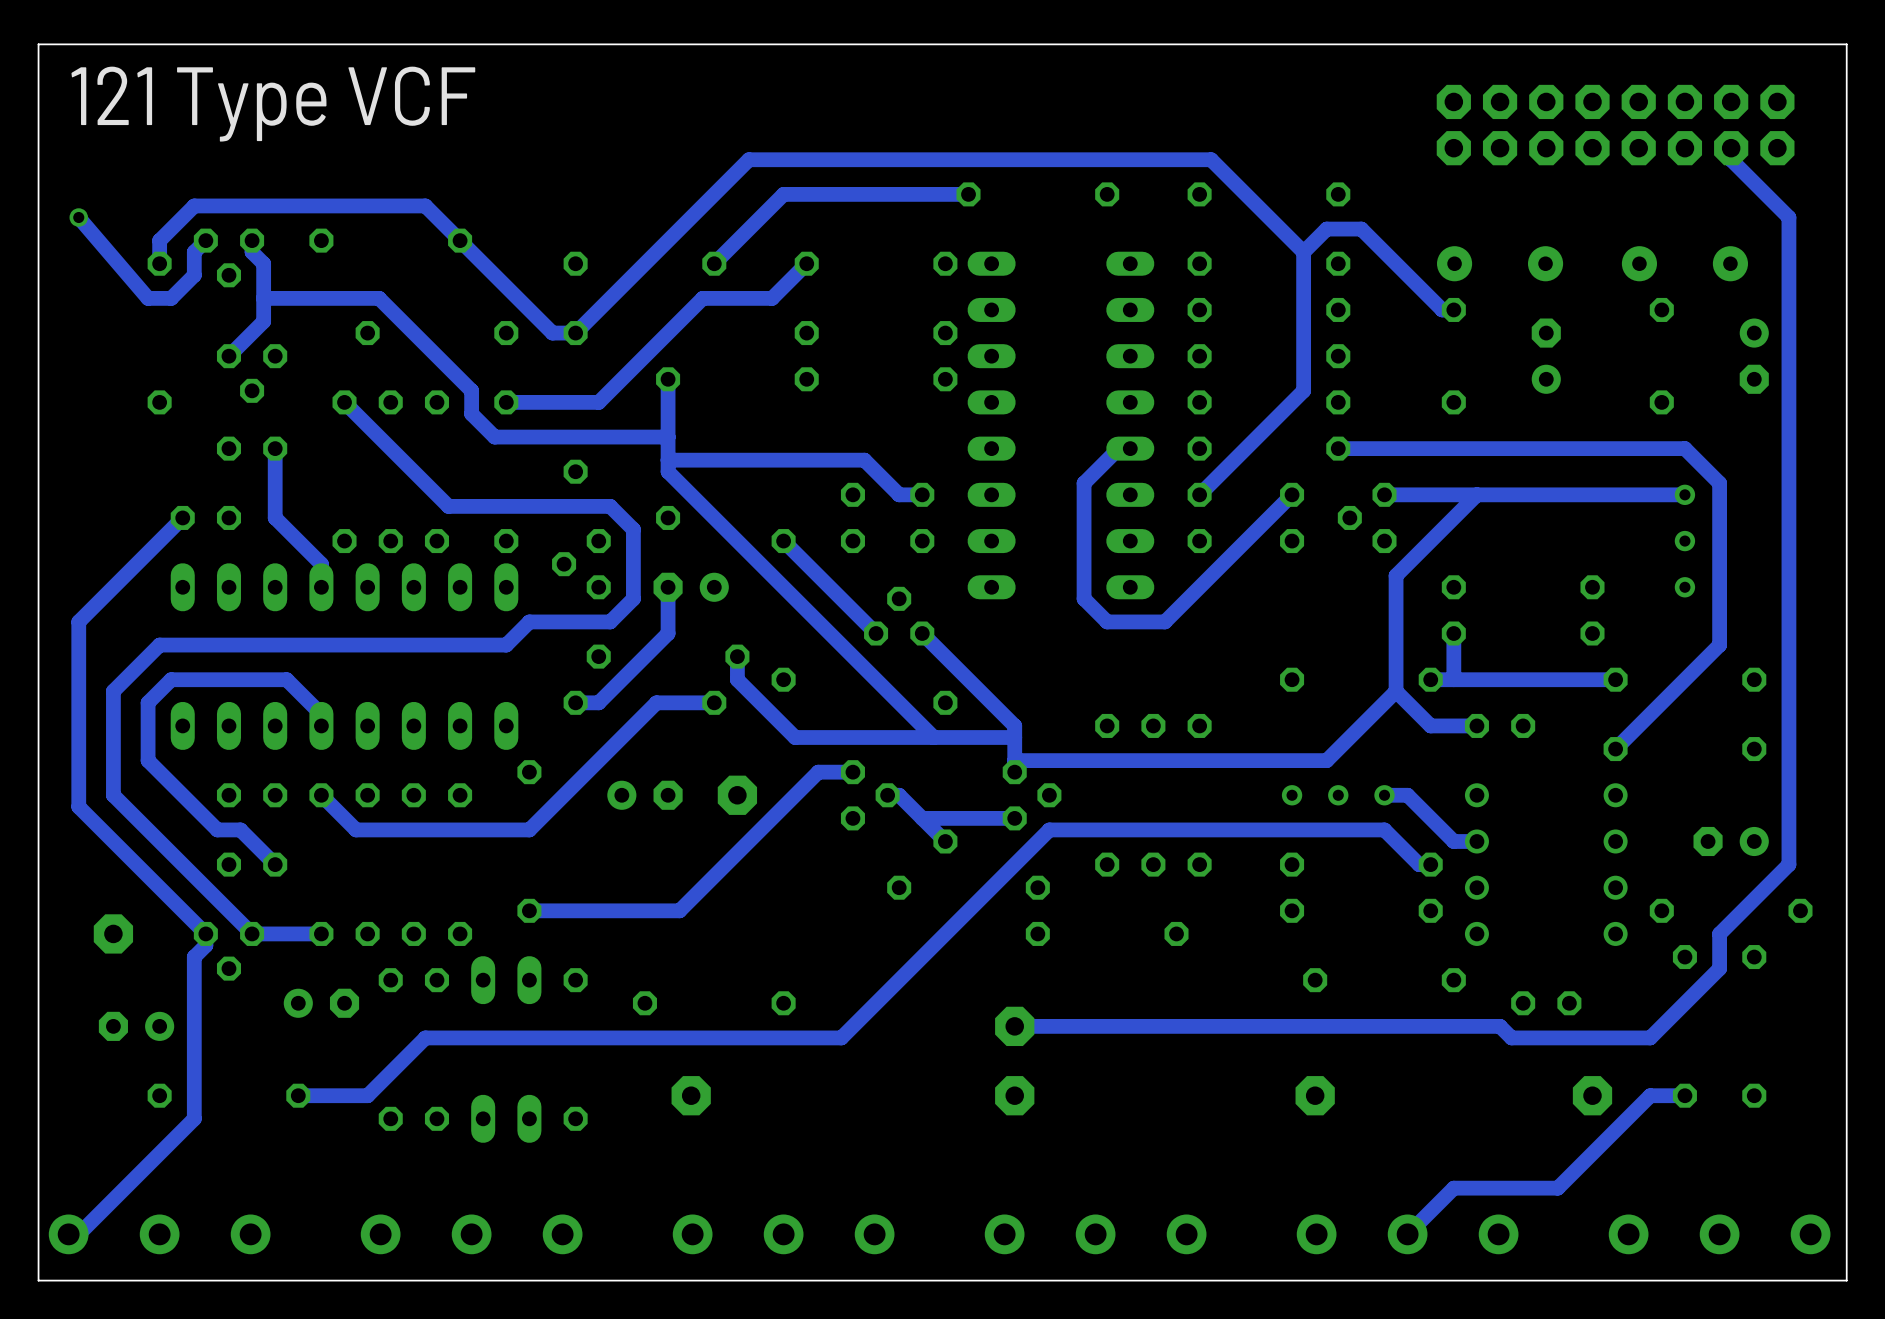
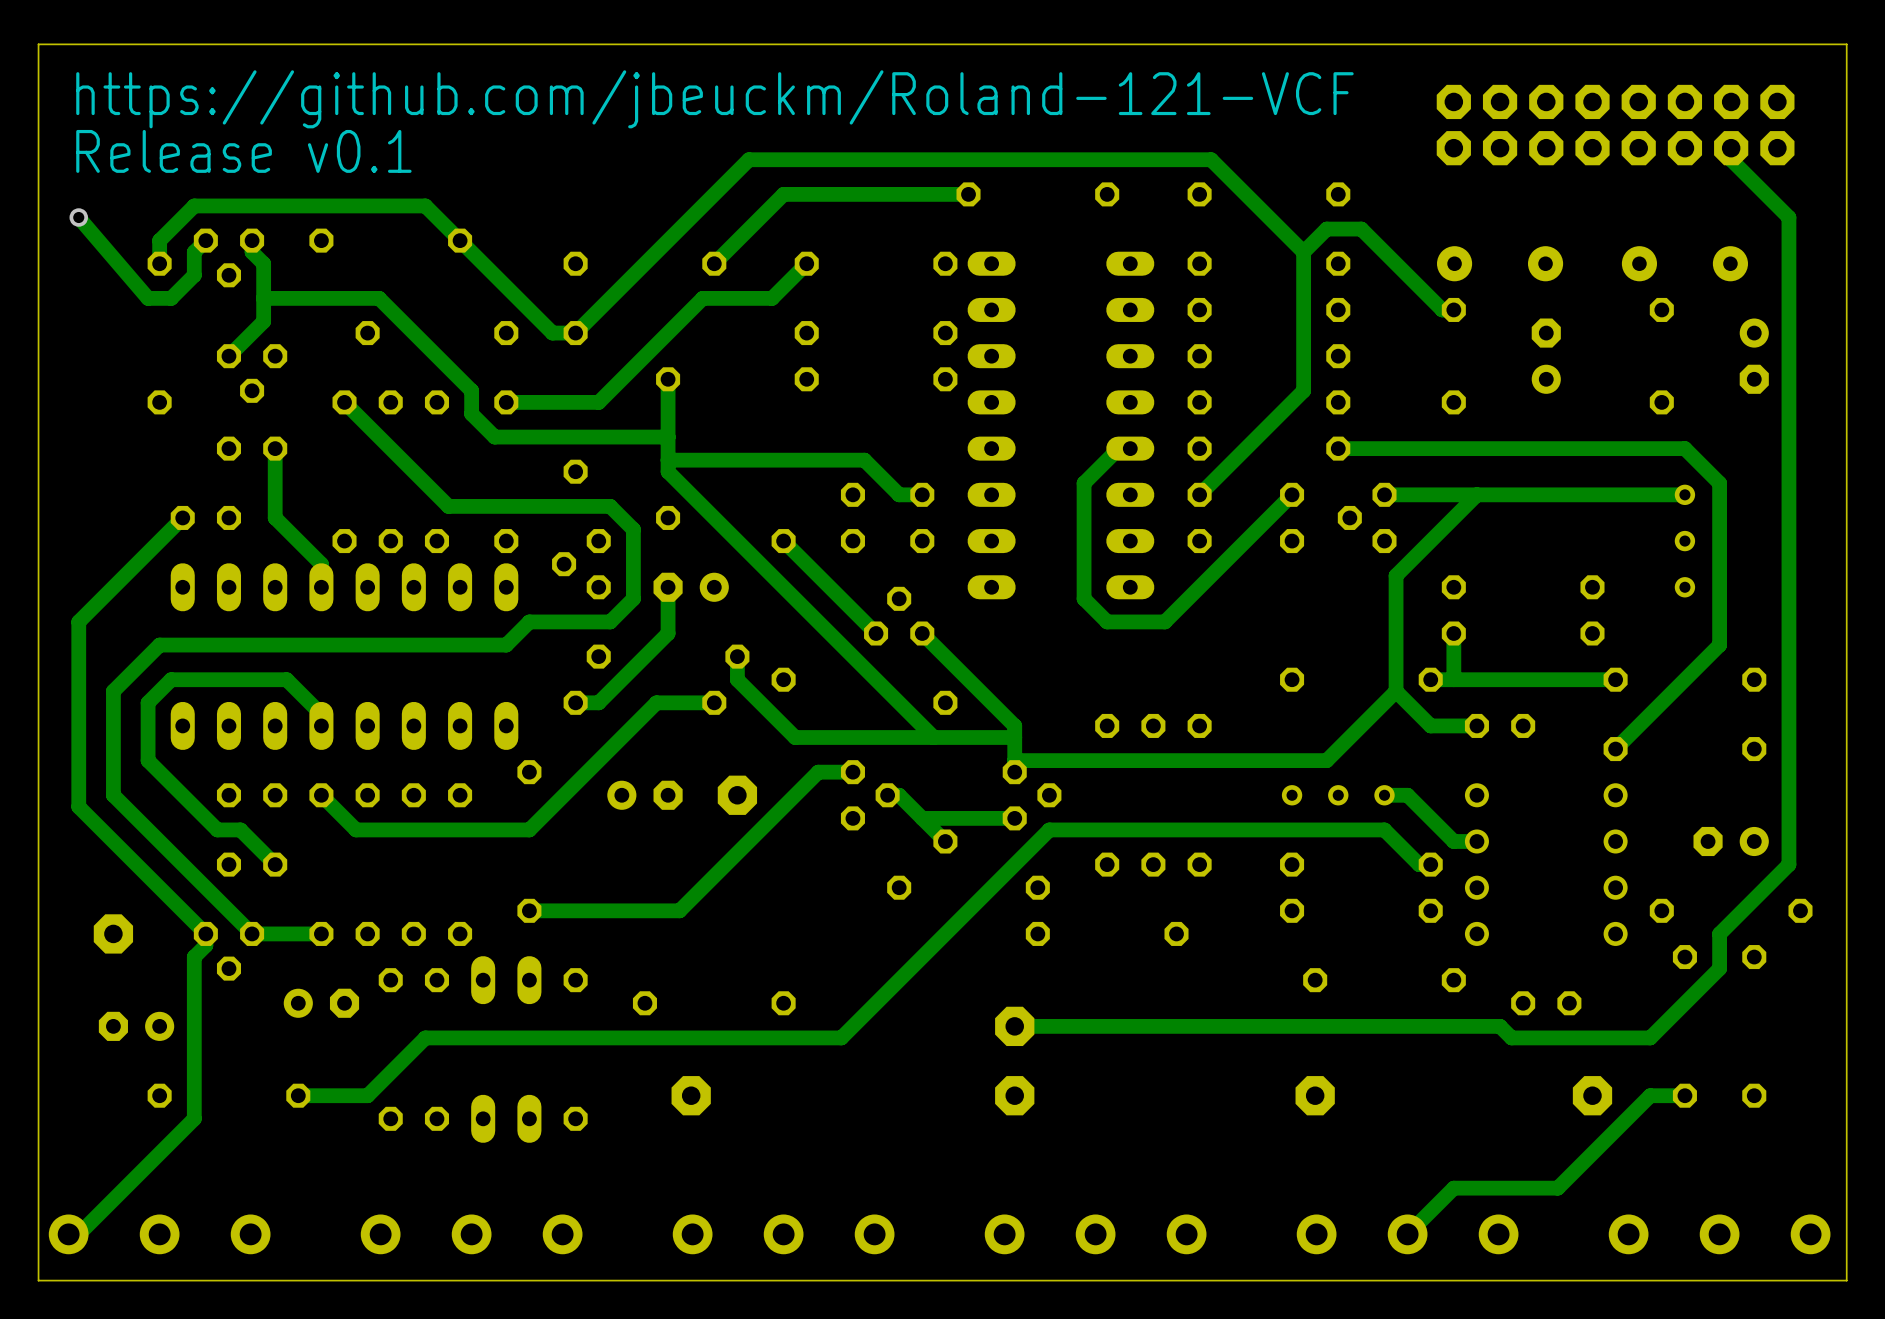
text: 121 Type VCF (273, 104) -> https://github.com/jbeuckm/Roland-121-VCF (714, 99)
text: none -> Release v0.1 (243, 151)

